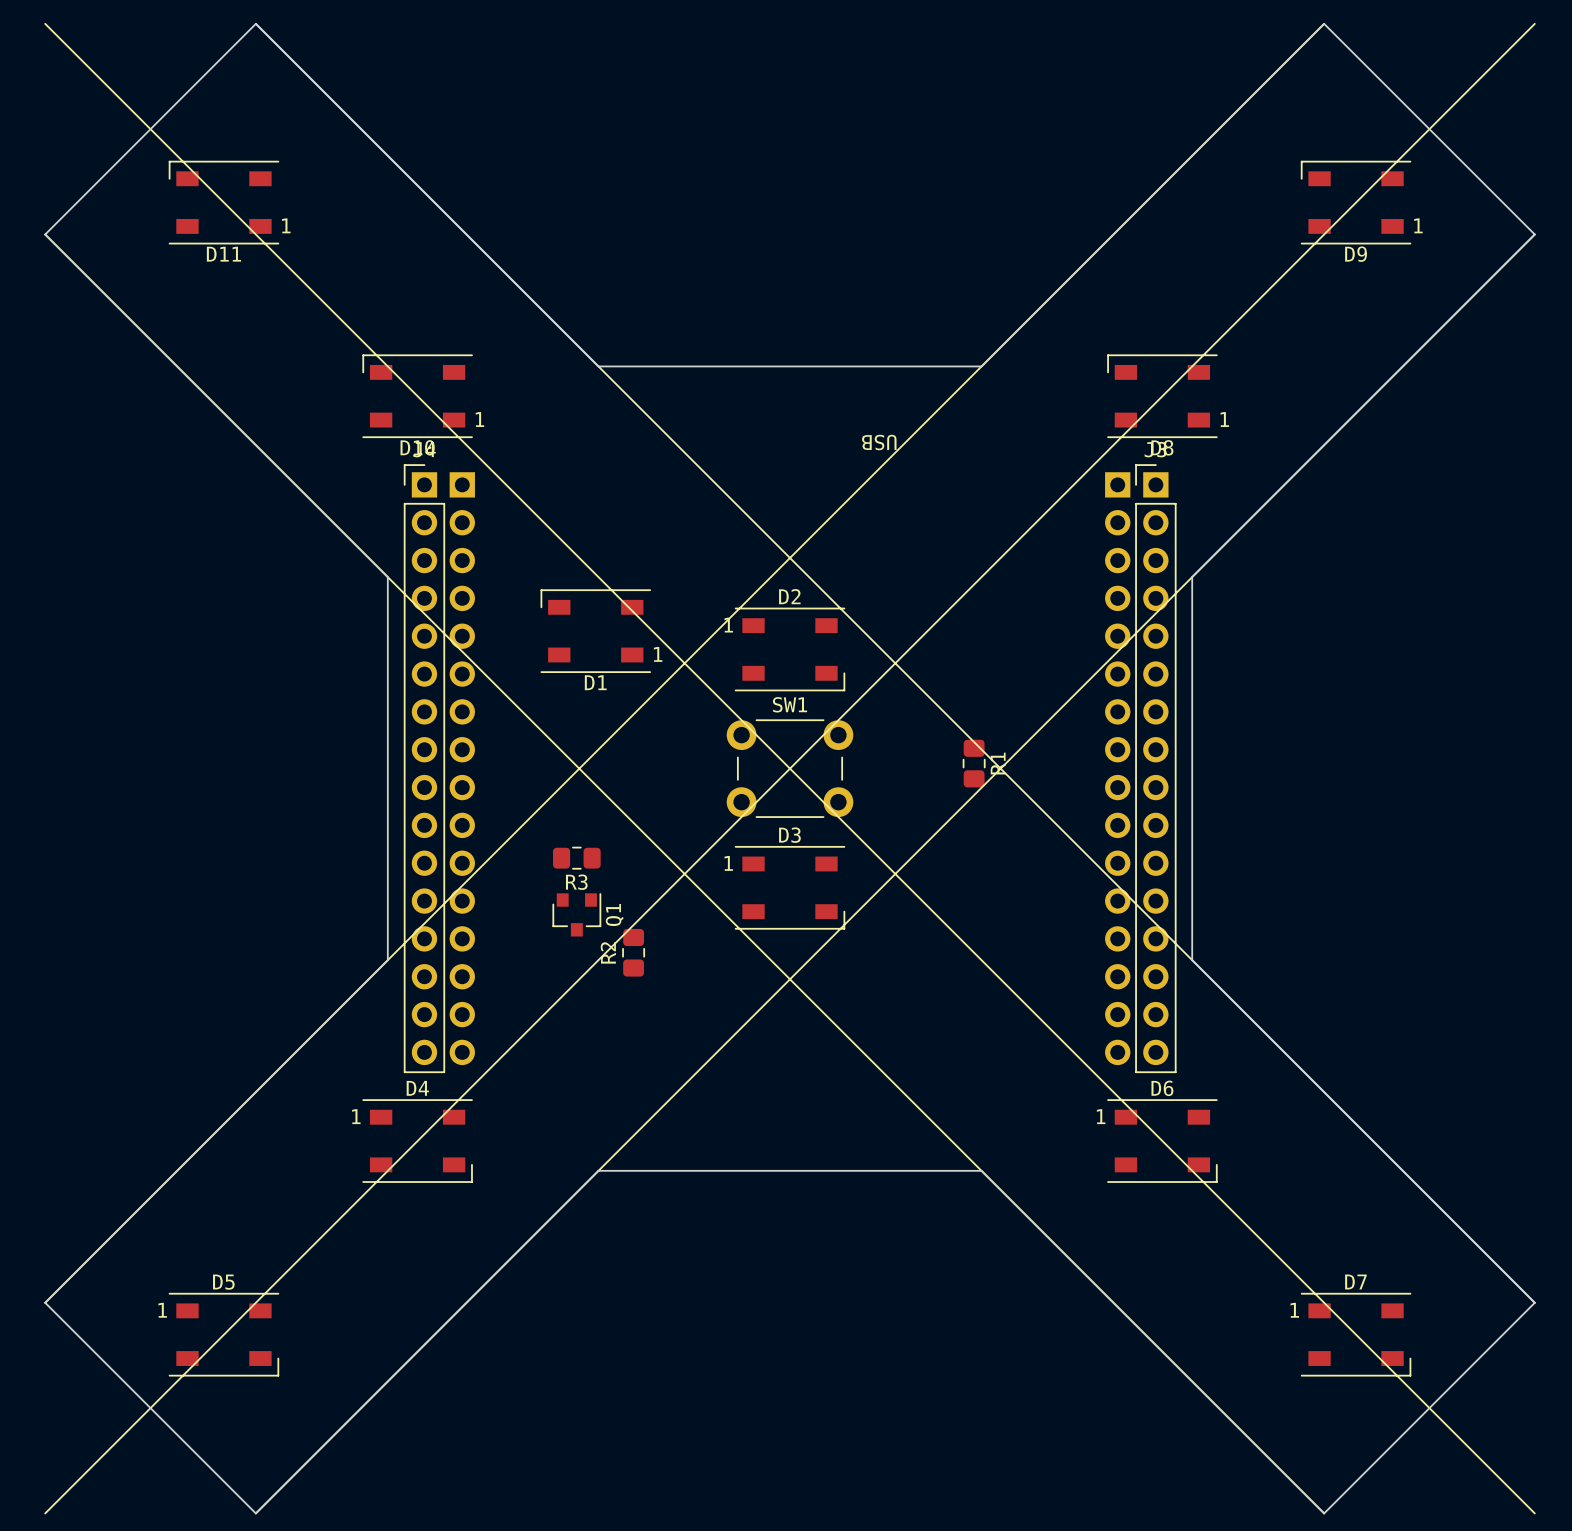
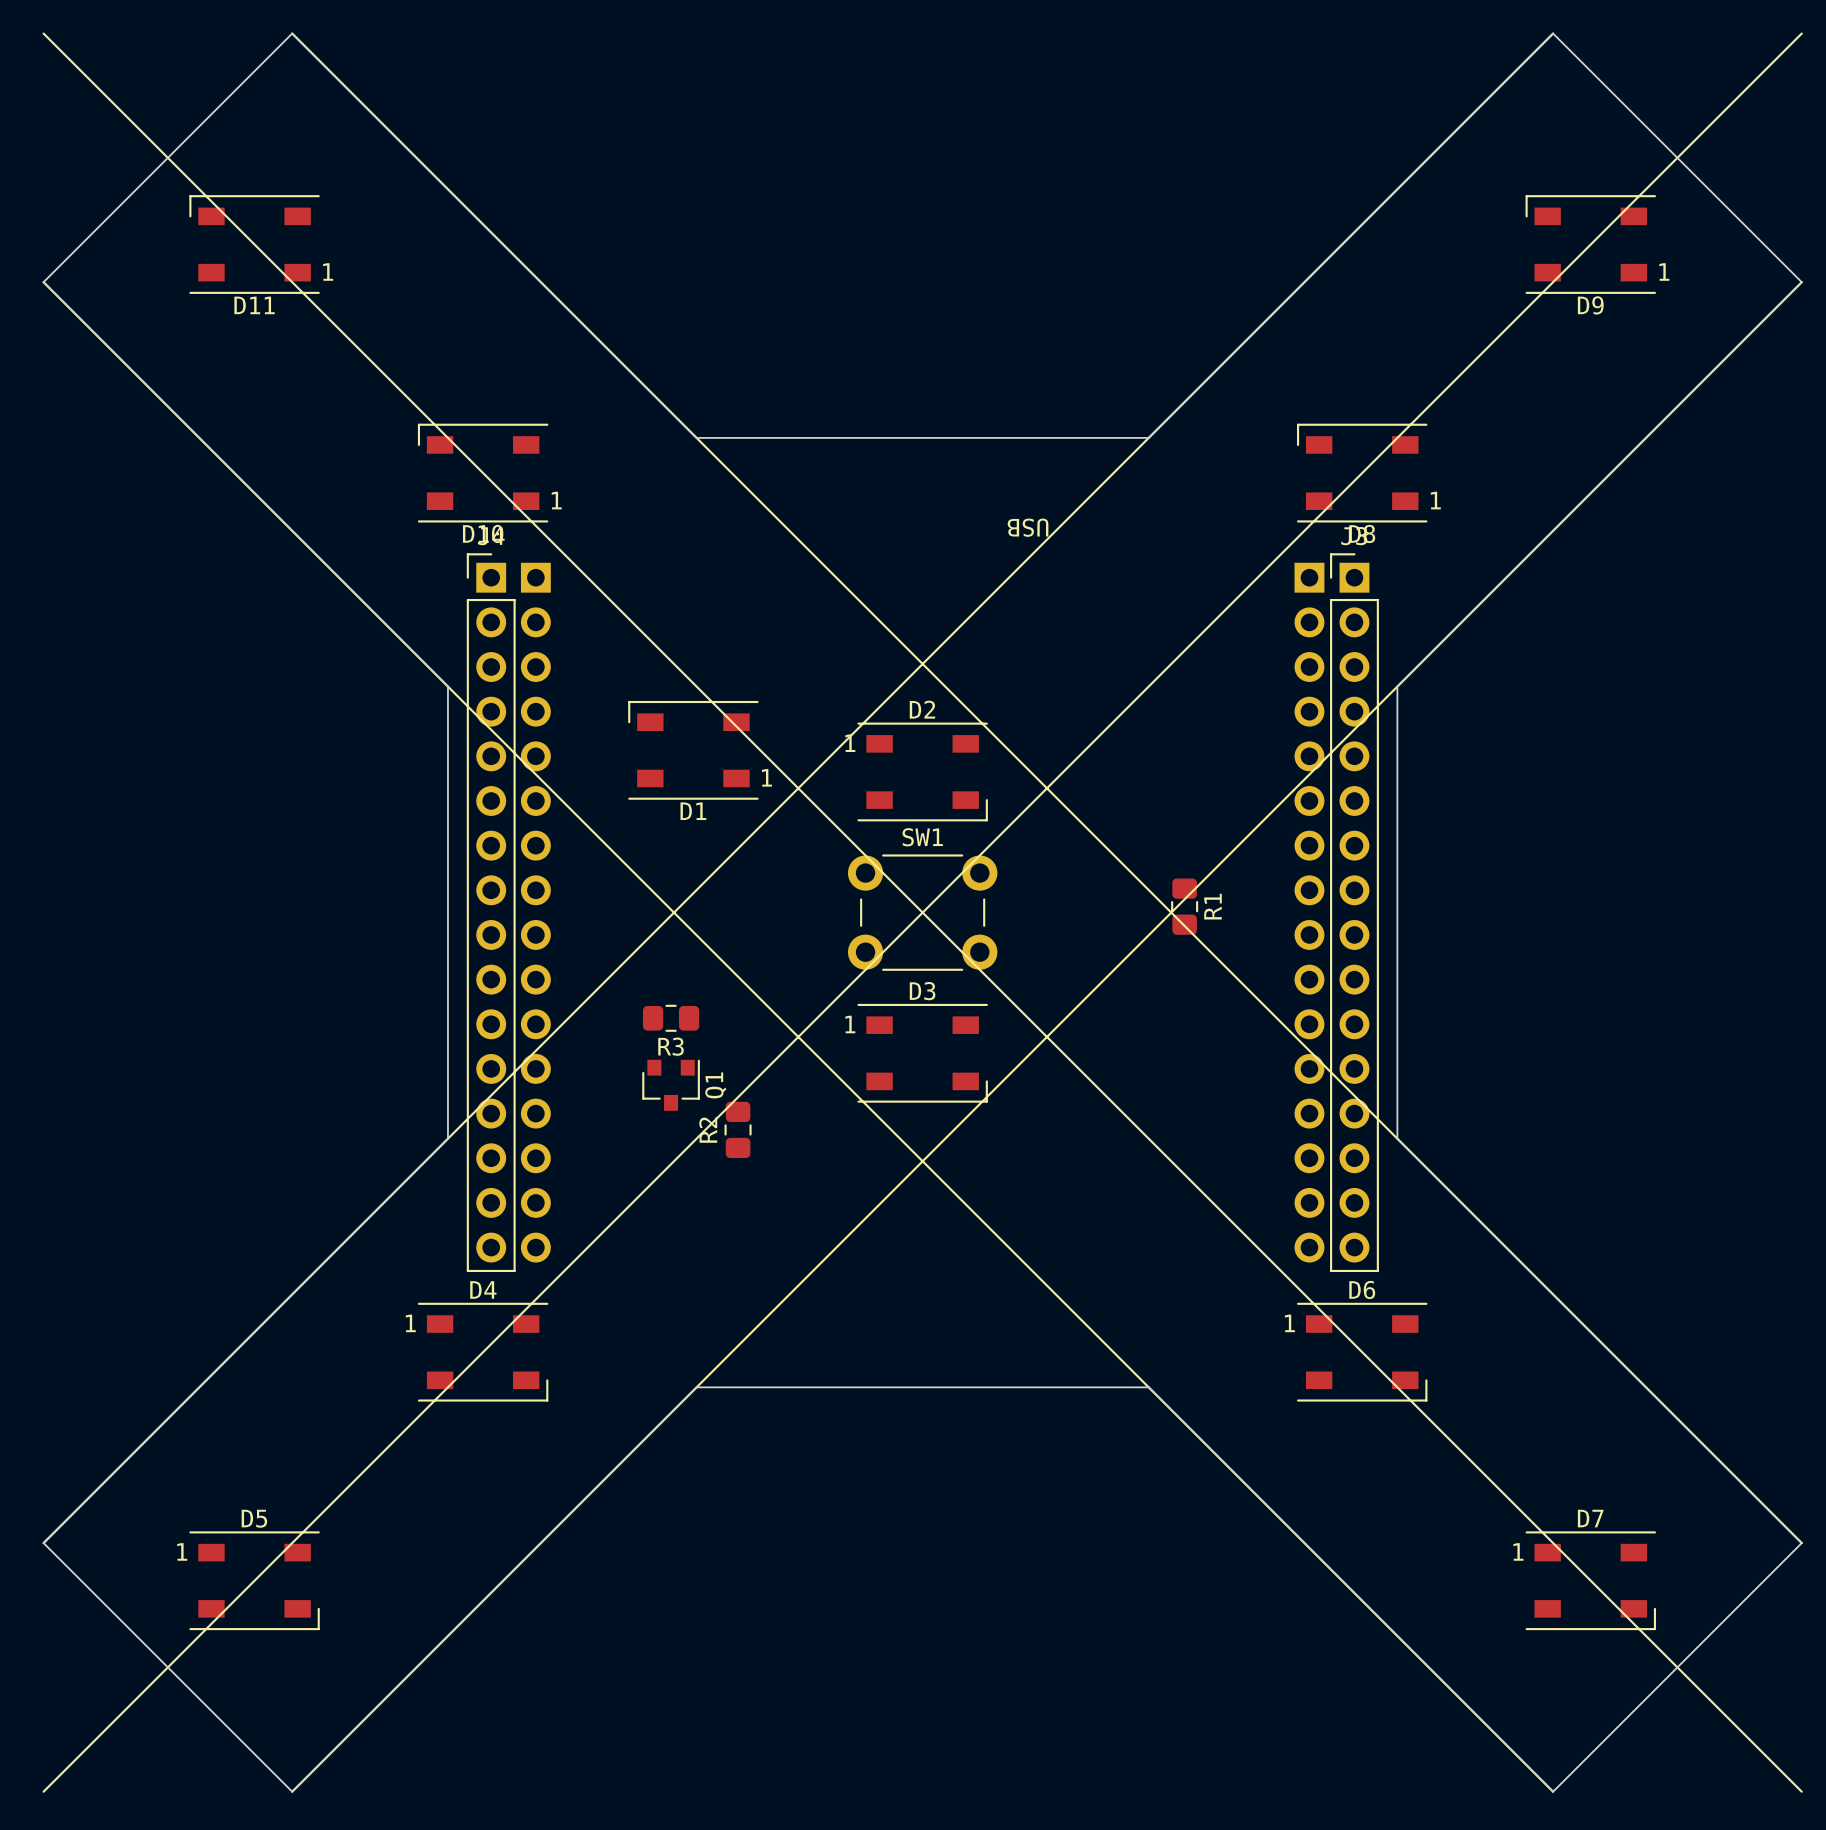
R1 position: (974, 763) -> (1184, 906)

